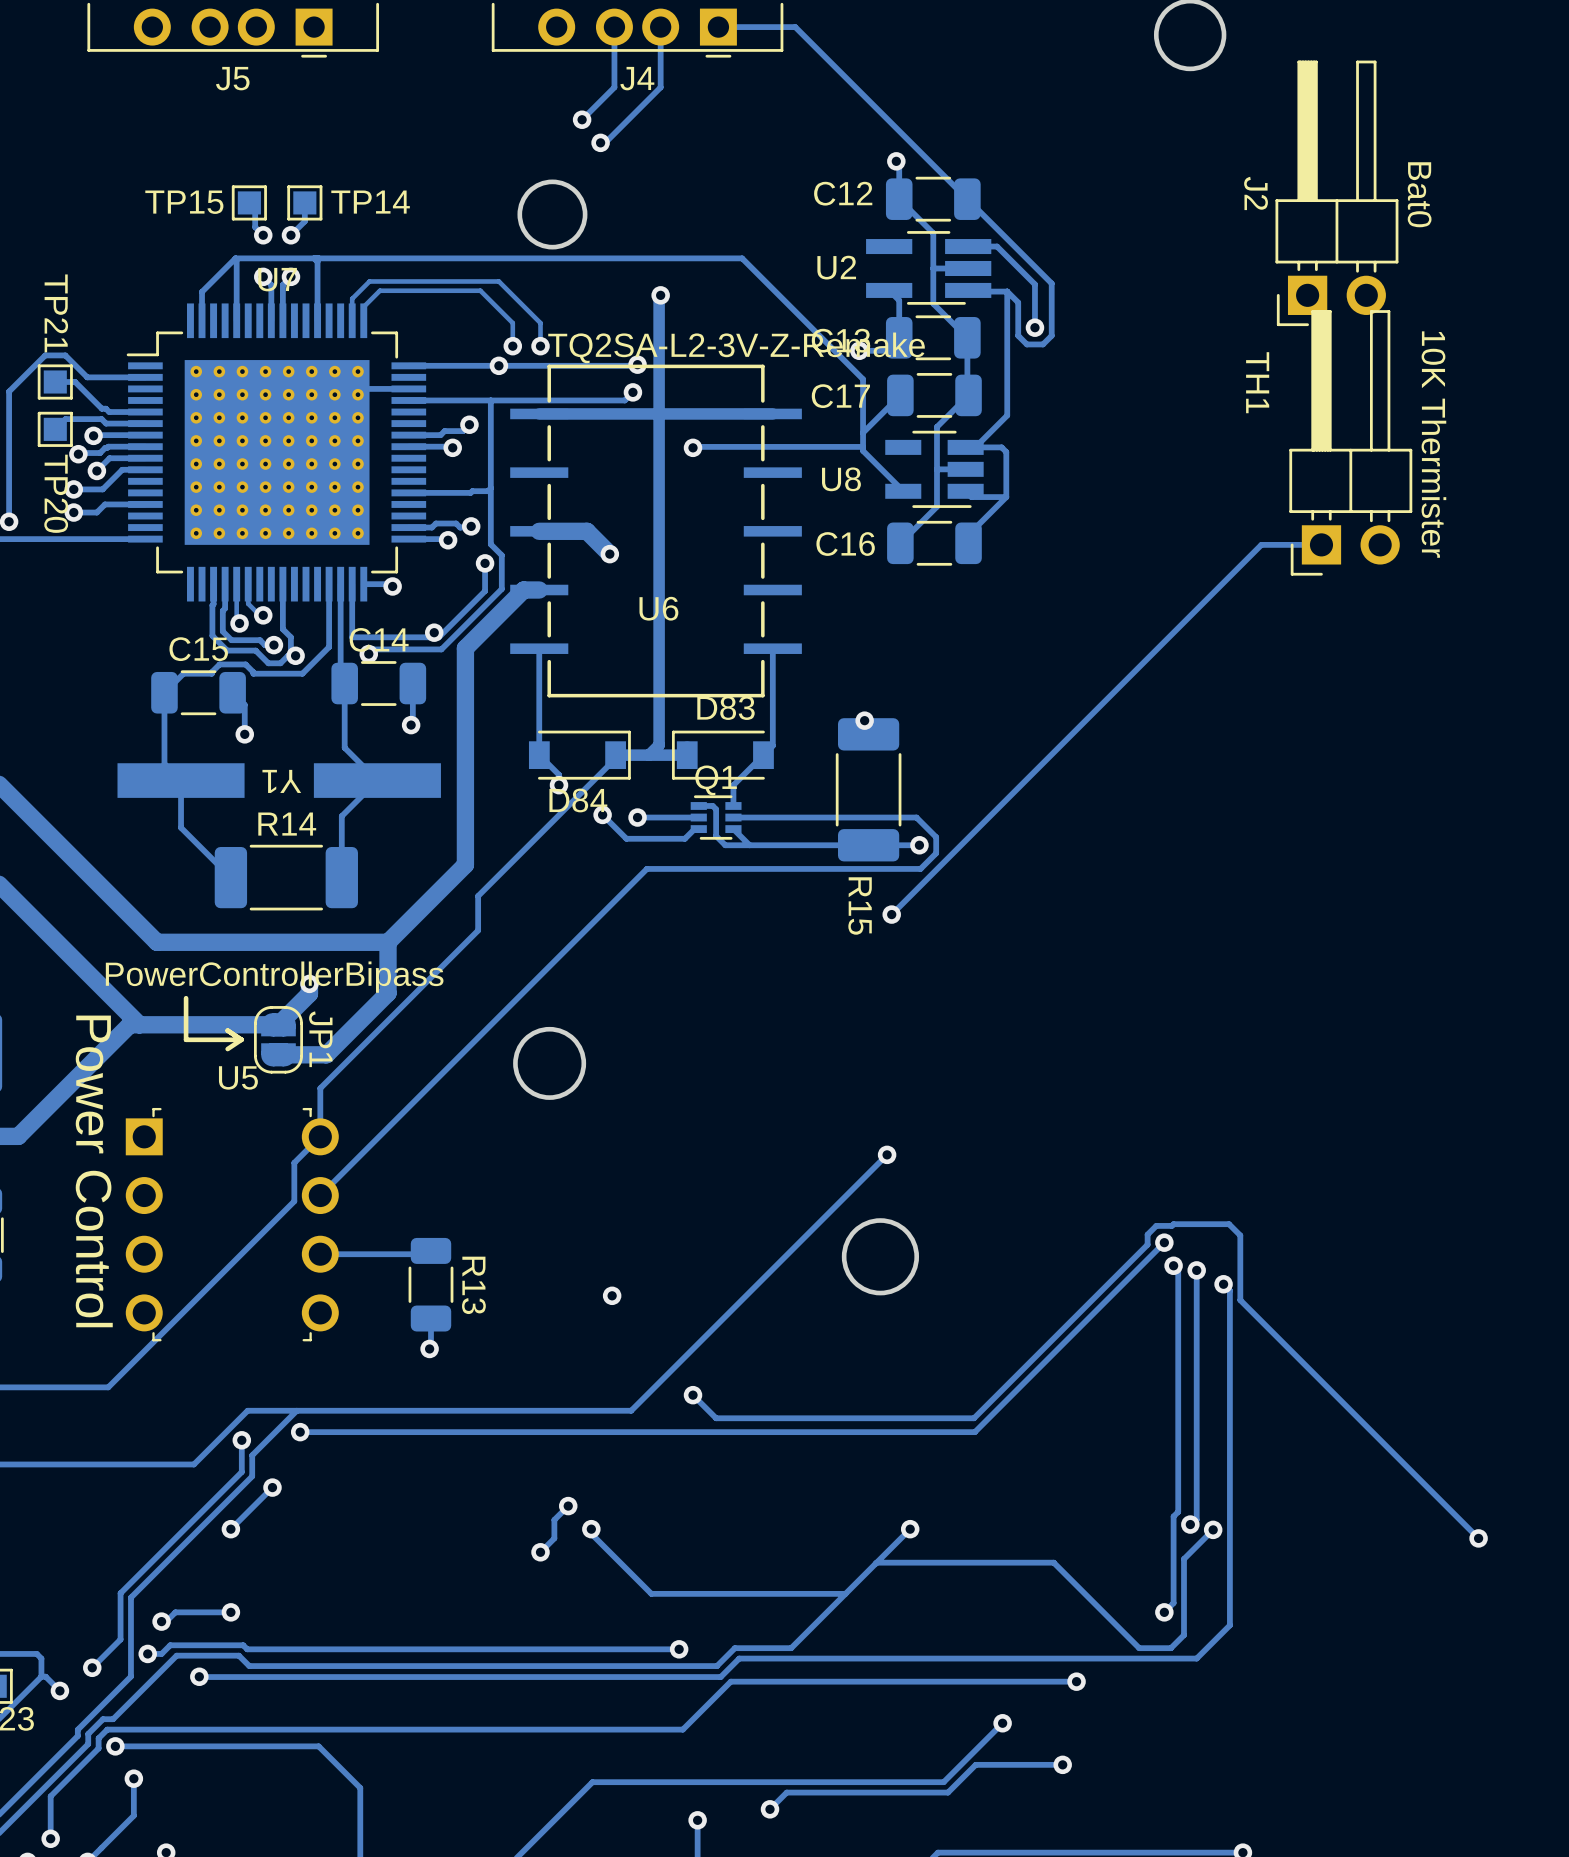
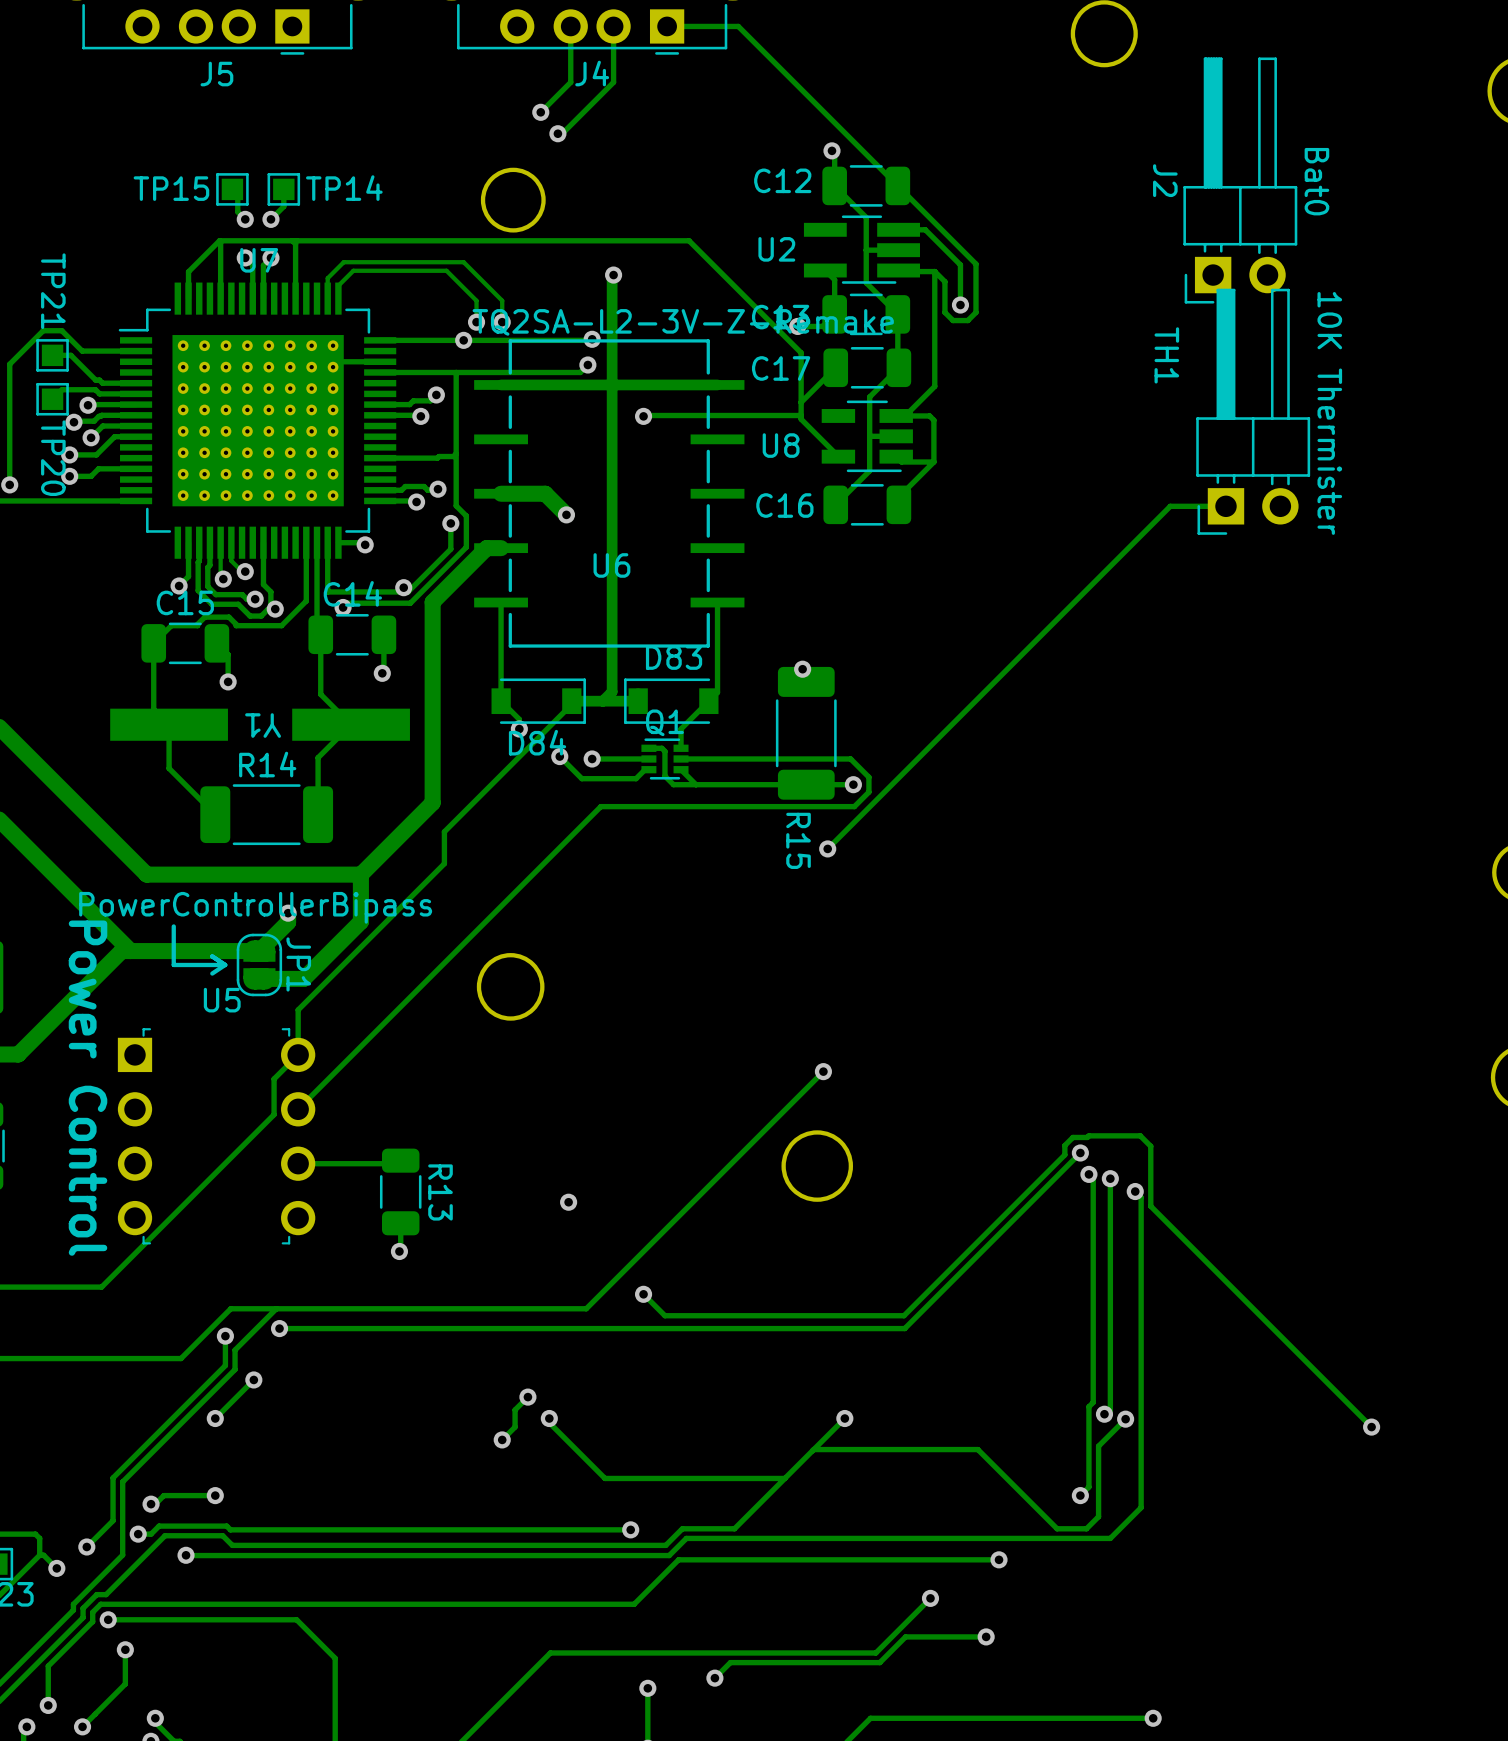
track: none -> (188, 542) (188, 576) (179, 585)
via: none -> (179, 585)

